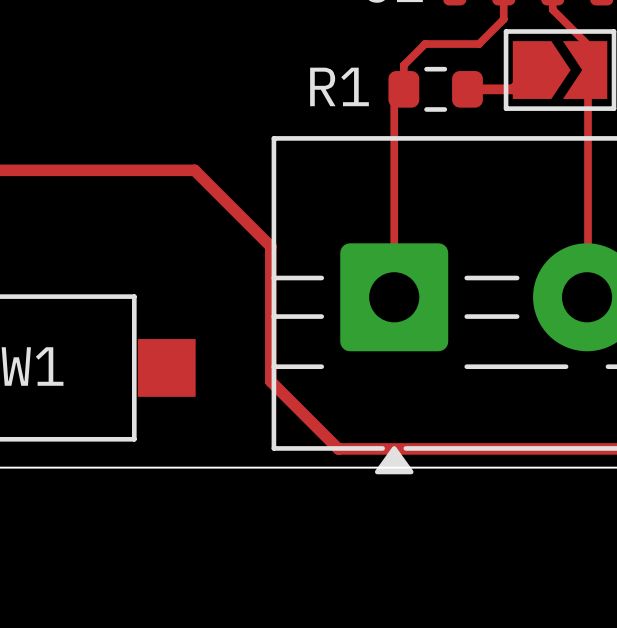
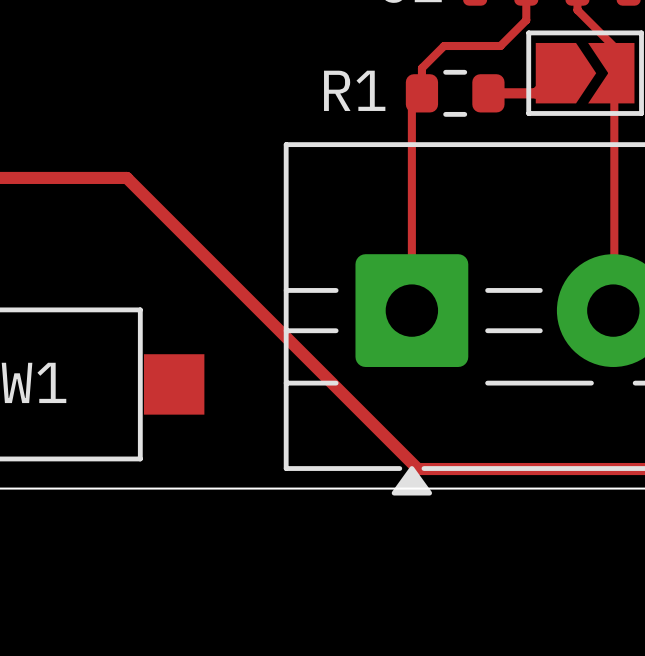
track: (121, 170) (194, 170) (270, 246) (270, 381) (338, 448) (400, 448) -> (126, 177) (417, 469)

